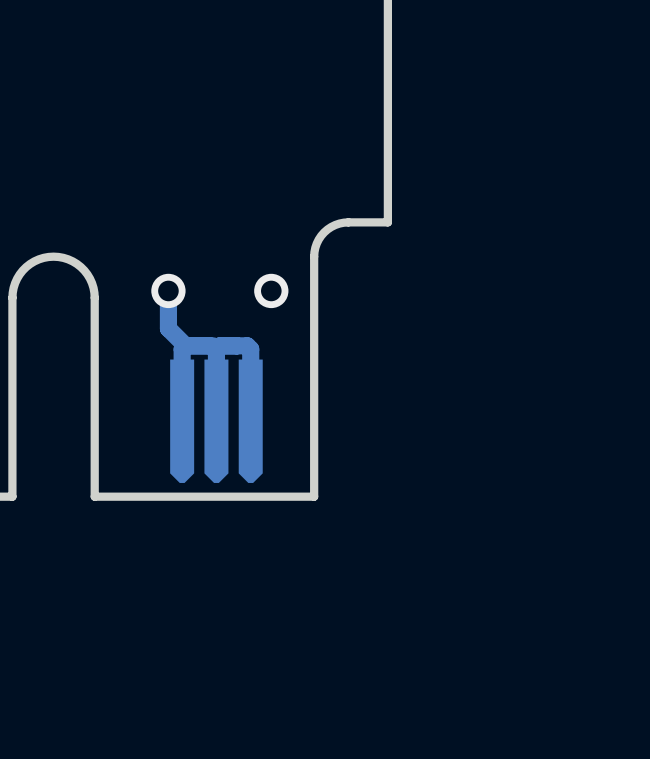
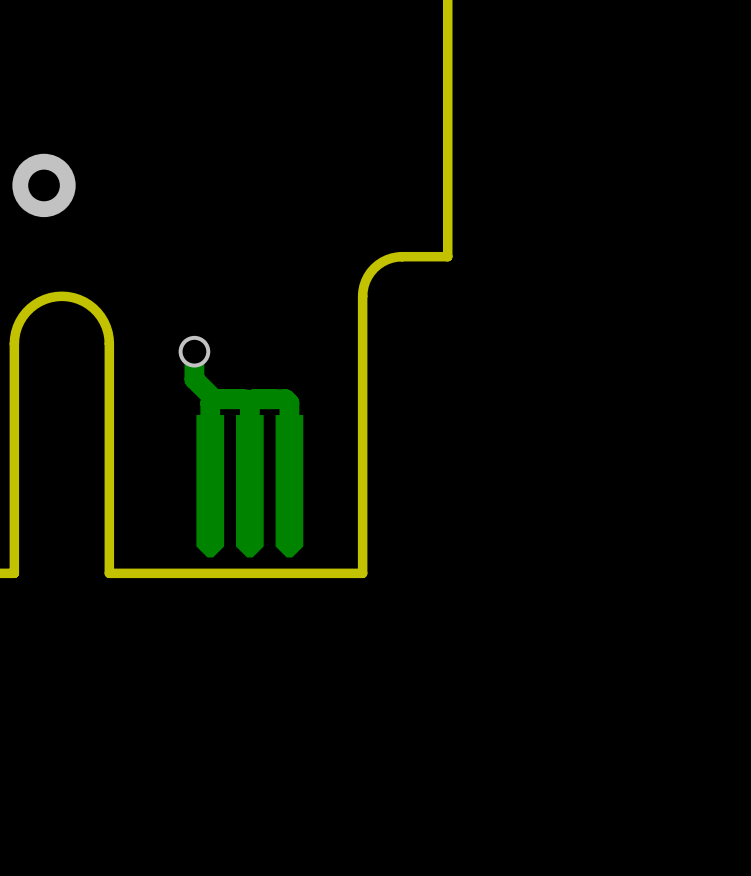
via: none -> (44, 185)
via size: [151, 273, 186, 309] -> [178, 335, 211, 368]
via: (271, 290) -> none

